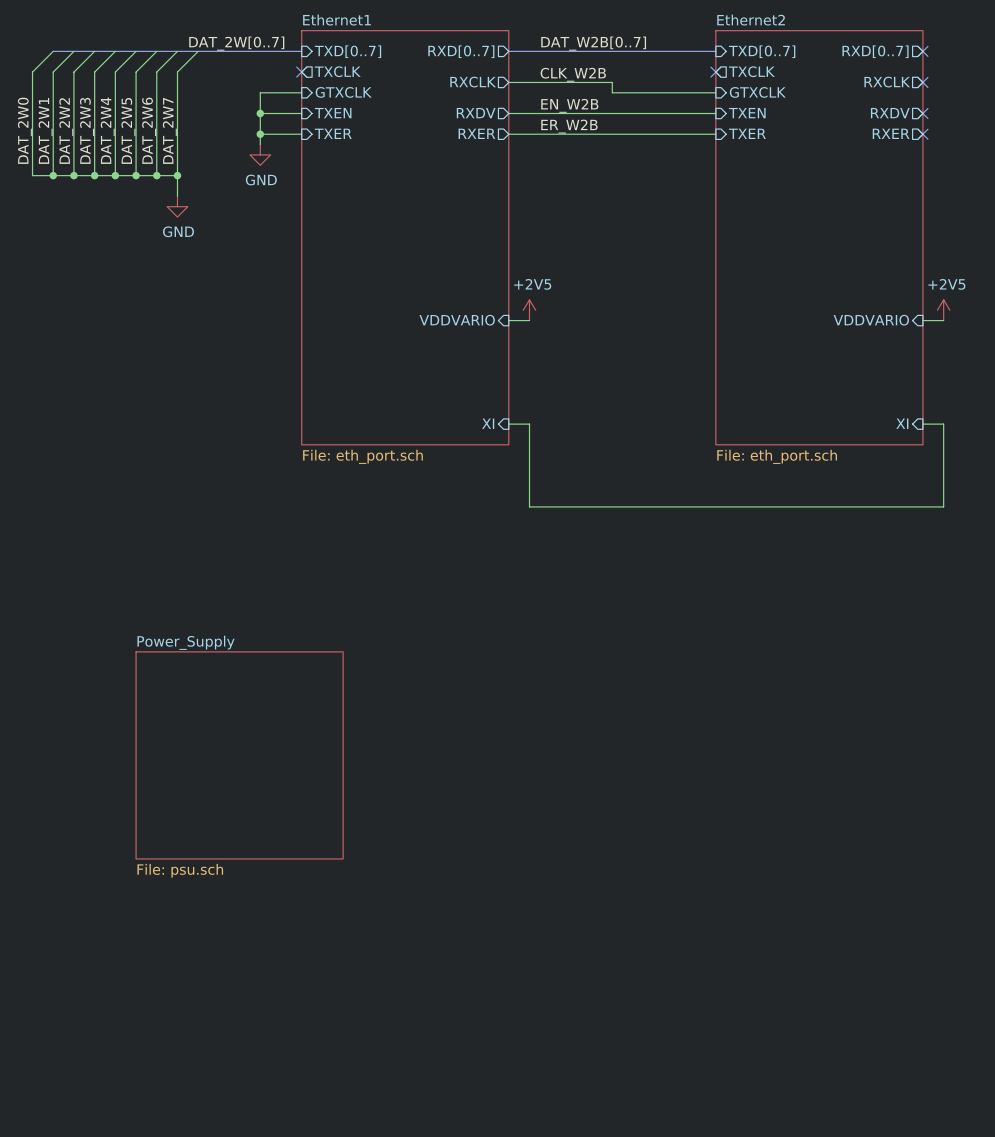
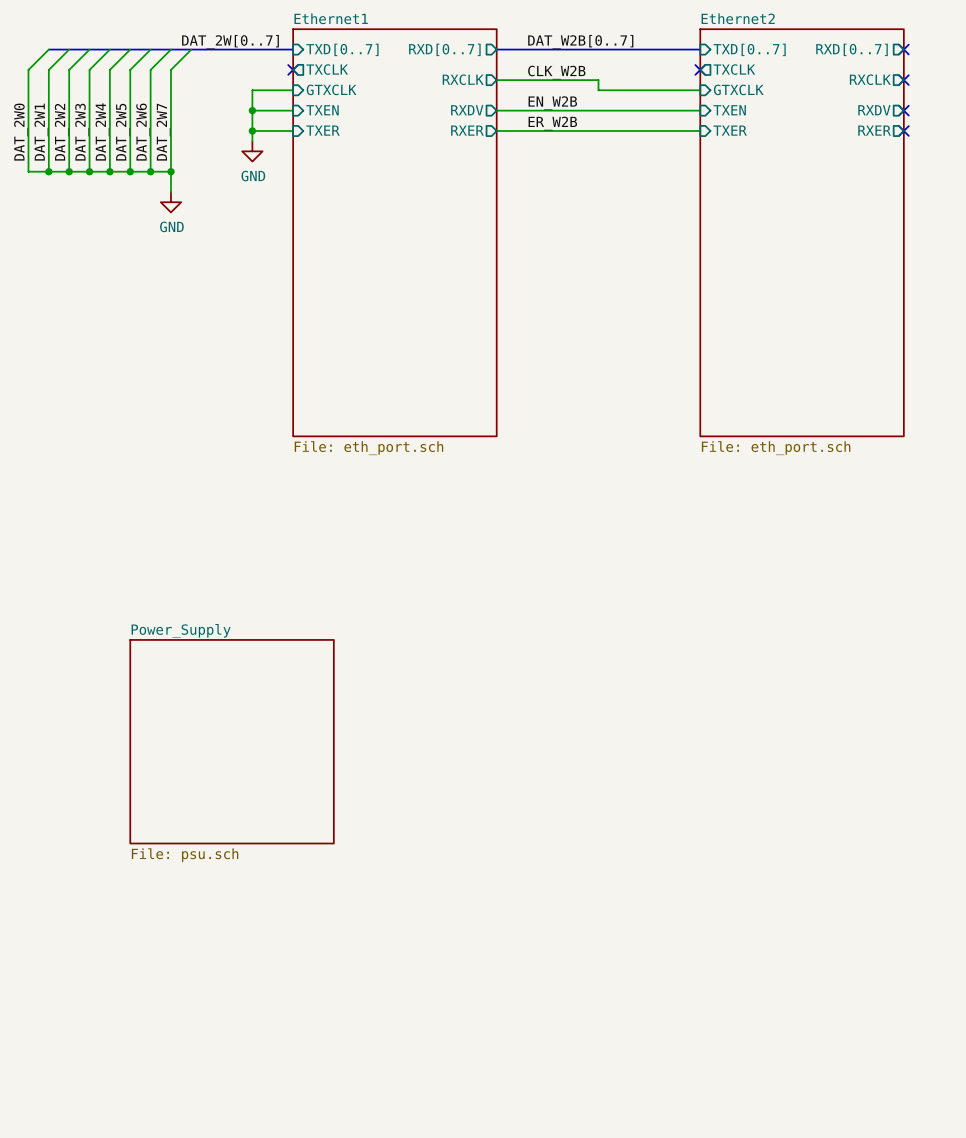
power symbol: +2V5 (529, 310) -> none
power symbol: +2V5 (943, 310) -> none
sheet pin: VDDVARIO (457, 320) -> none
wire: (508, 320) (529, 320) -> none
sheet pin: VDDVARIO (871, 320) -> none
wire: (922, 320) (943, 320) -> none
sheet pin: XI (488, 423) -> none
sheet pin: XI (902, 423) -> none
wire: (508, 424) (529, 424) (529, 506) (943, 506) (943, 424) (922, 424) -> none

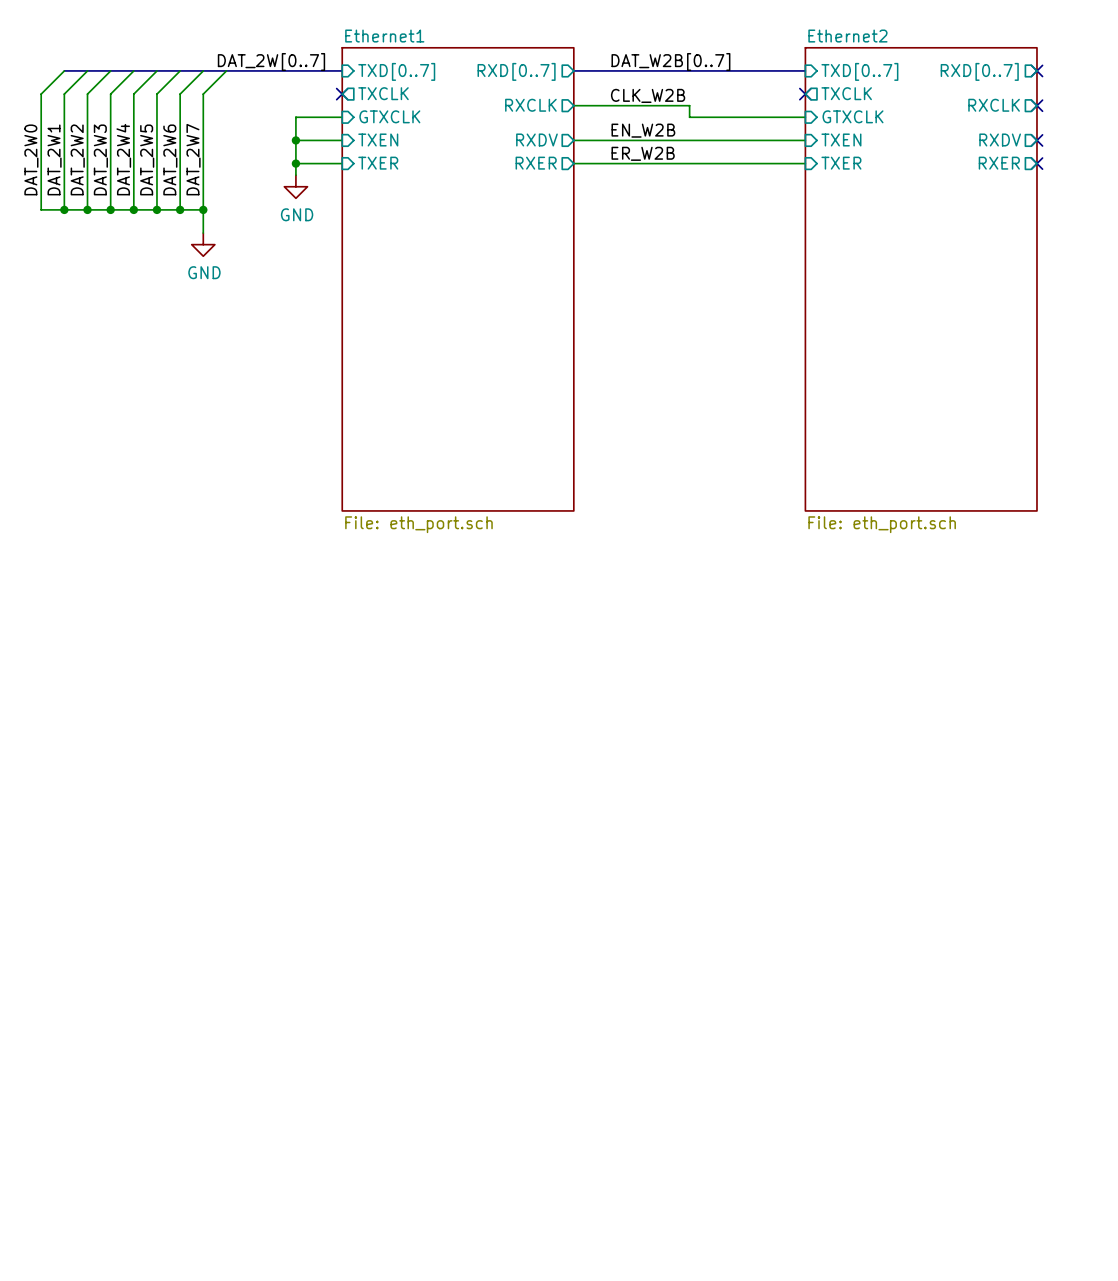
sheet Power_Supply: File: psu.sch (232, 741) -> none

